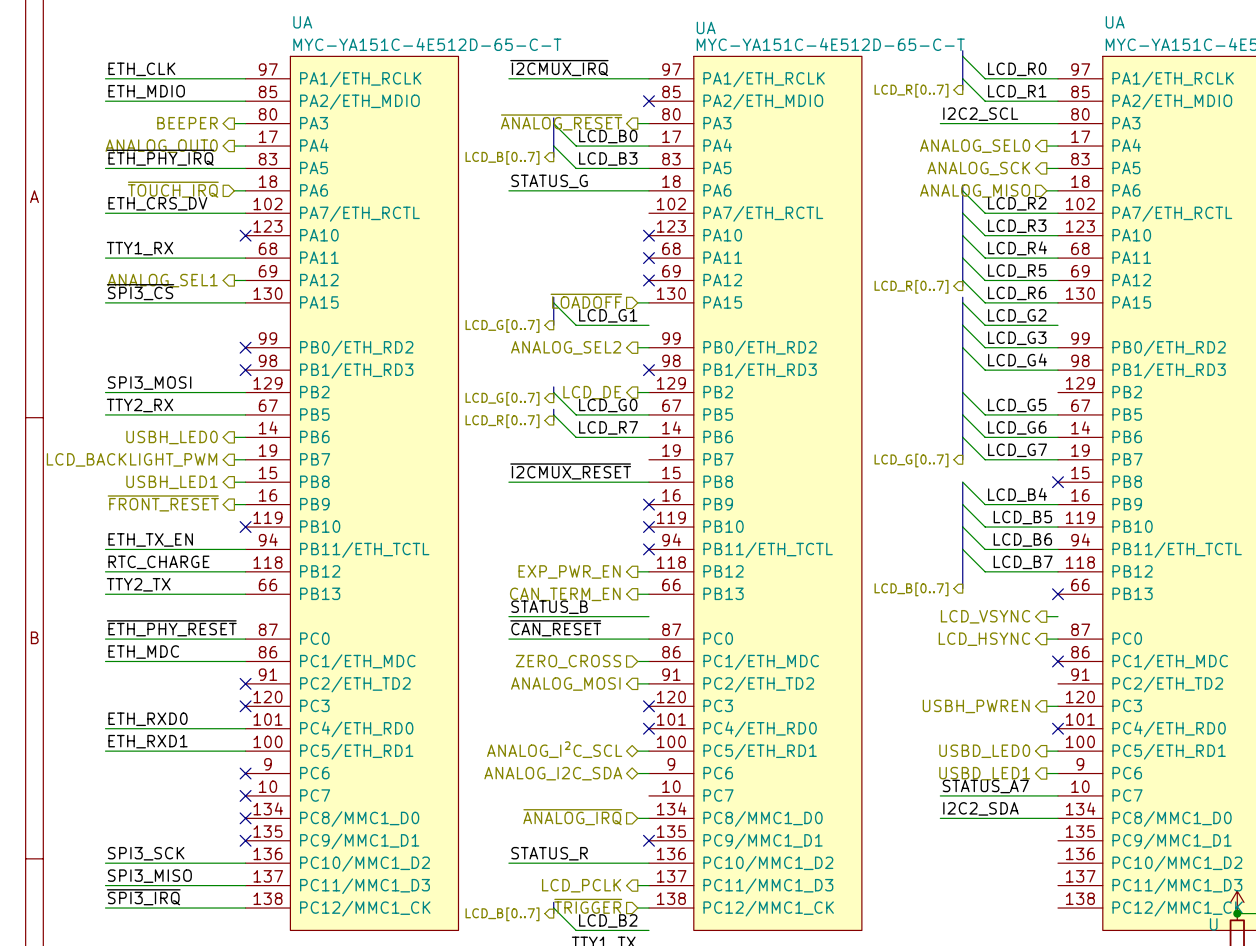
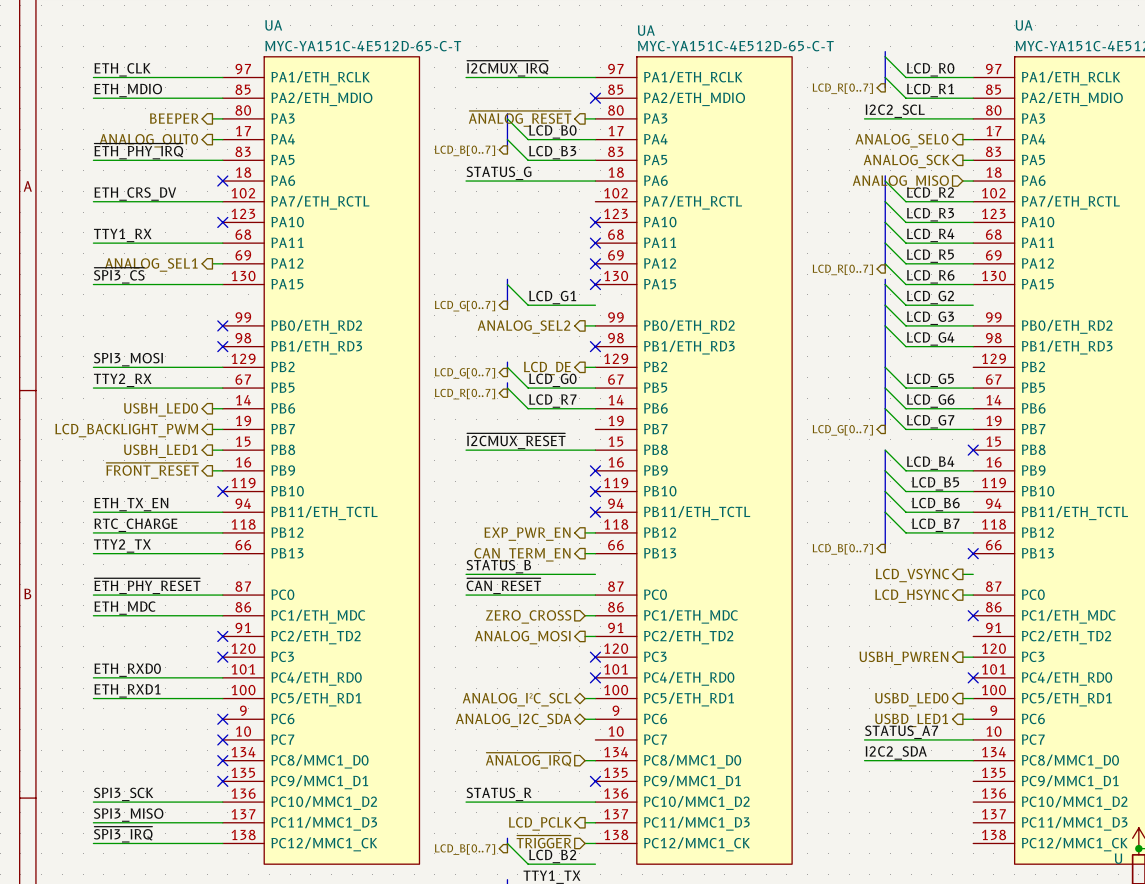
hierarchical label: ~{TOUCH_IRQ} (173, 189) -> none
wire: (234, 190) (245, 190) -> none
no-connect mark: none -> (222, 181)
hierarchical label: ~{LOADOFF} (586, 301) -> none
wire: (637, 302) (648, 302) -> none
no-connect mark: none -> (595, 284)

